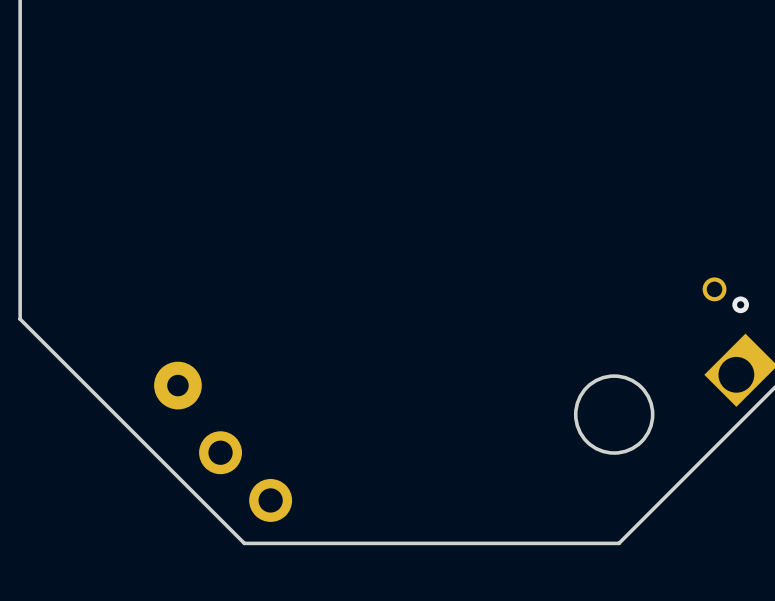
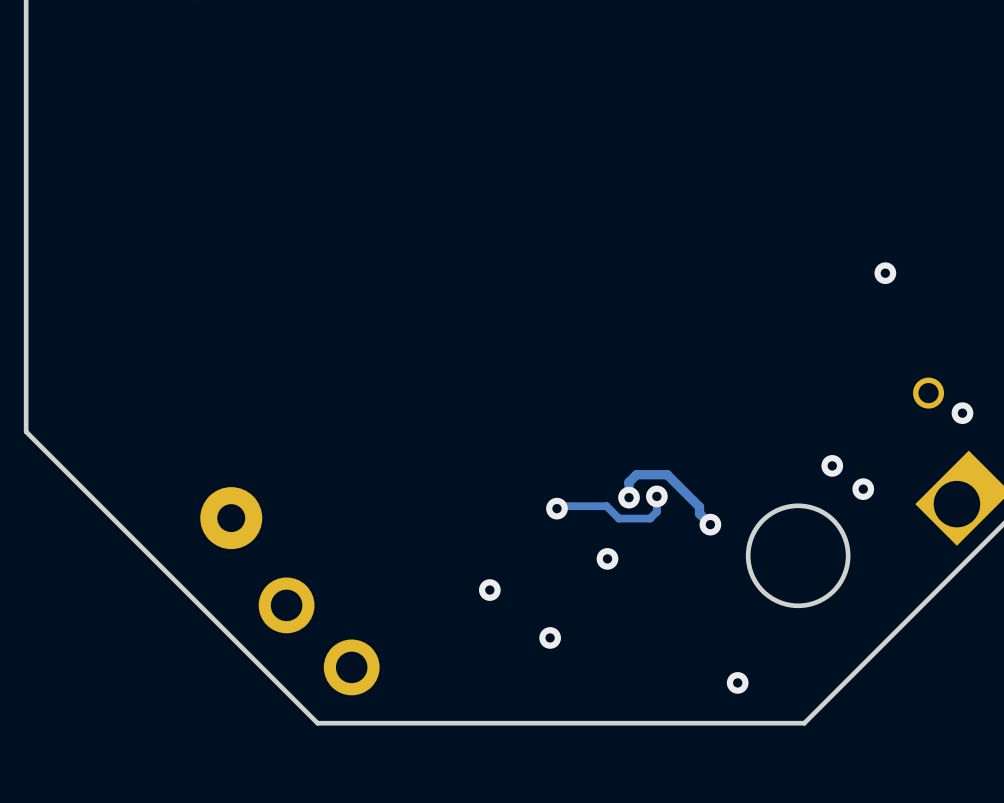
via: none -> (885, 273)
via: none -> (832, 465)
via: none -> (863, 489)
track: none -> (656, 496) (656, 511) (650, 518) (618, 518) (606, 506) (559, 506) (556, 508)
via: none -> (656, 496)
track: none -> (629, 497) (629, 482) (636, 474) (667, 474) (699, 506) (699, 513) (710, 524)
via: none -> (629, 497)
via: none -> (556, 508)
via: none -> (710, 524)
via: none -> (607, 558)
via: none -> (489, 590)
via: none -> (550, 637)
via: none -> (737, 682)

